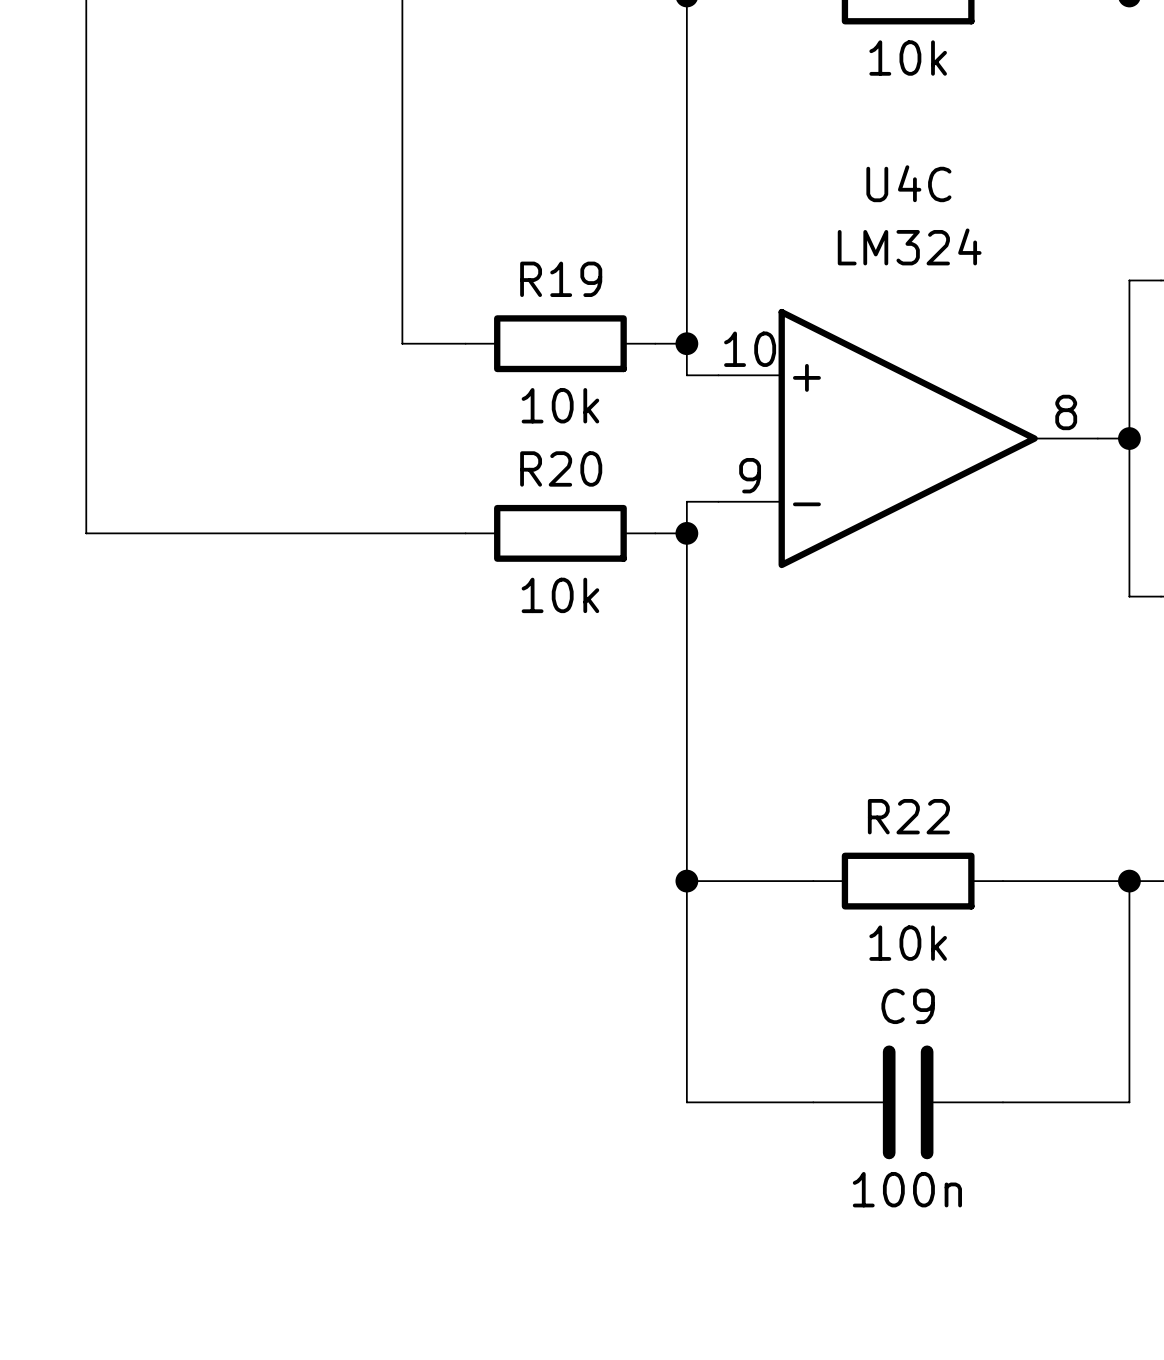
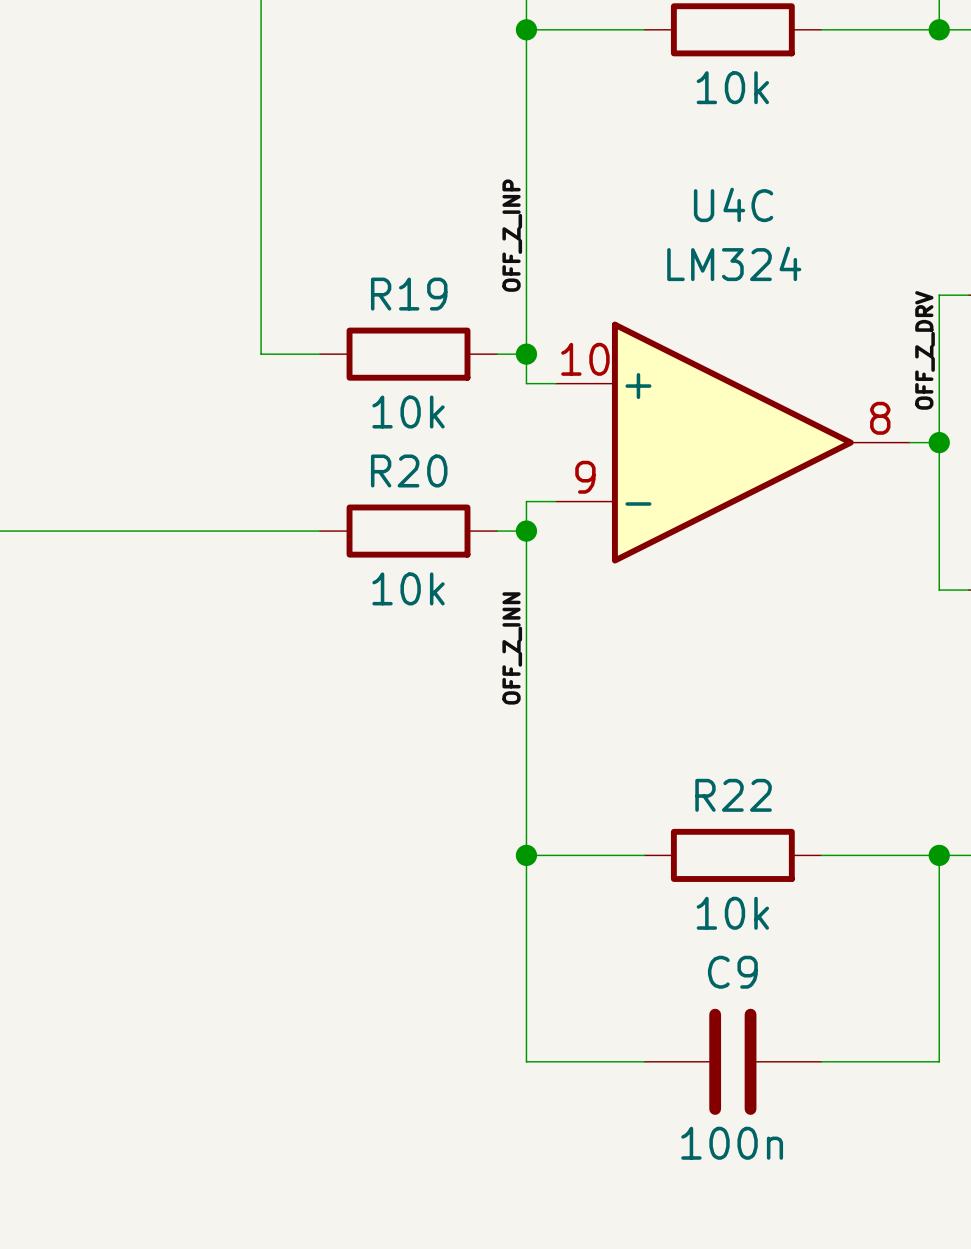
label: none -> OFF_Z_INP (512, 235)
label: none -> OFF_Z_DRV (925, 350)
label: none -> OFF_Z_INN (512, 648)

